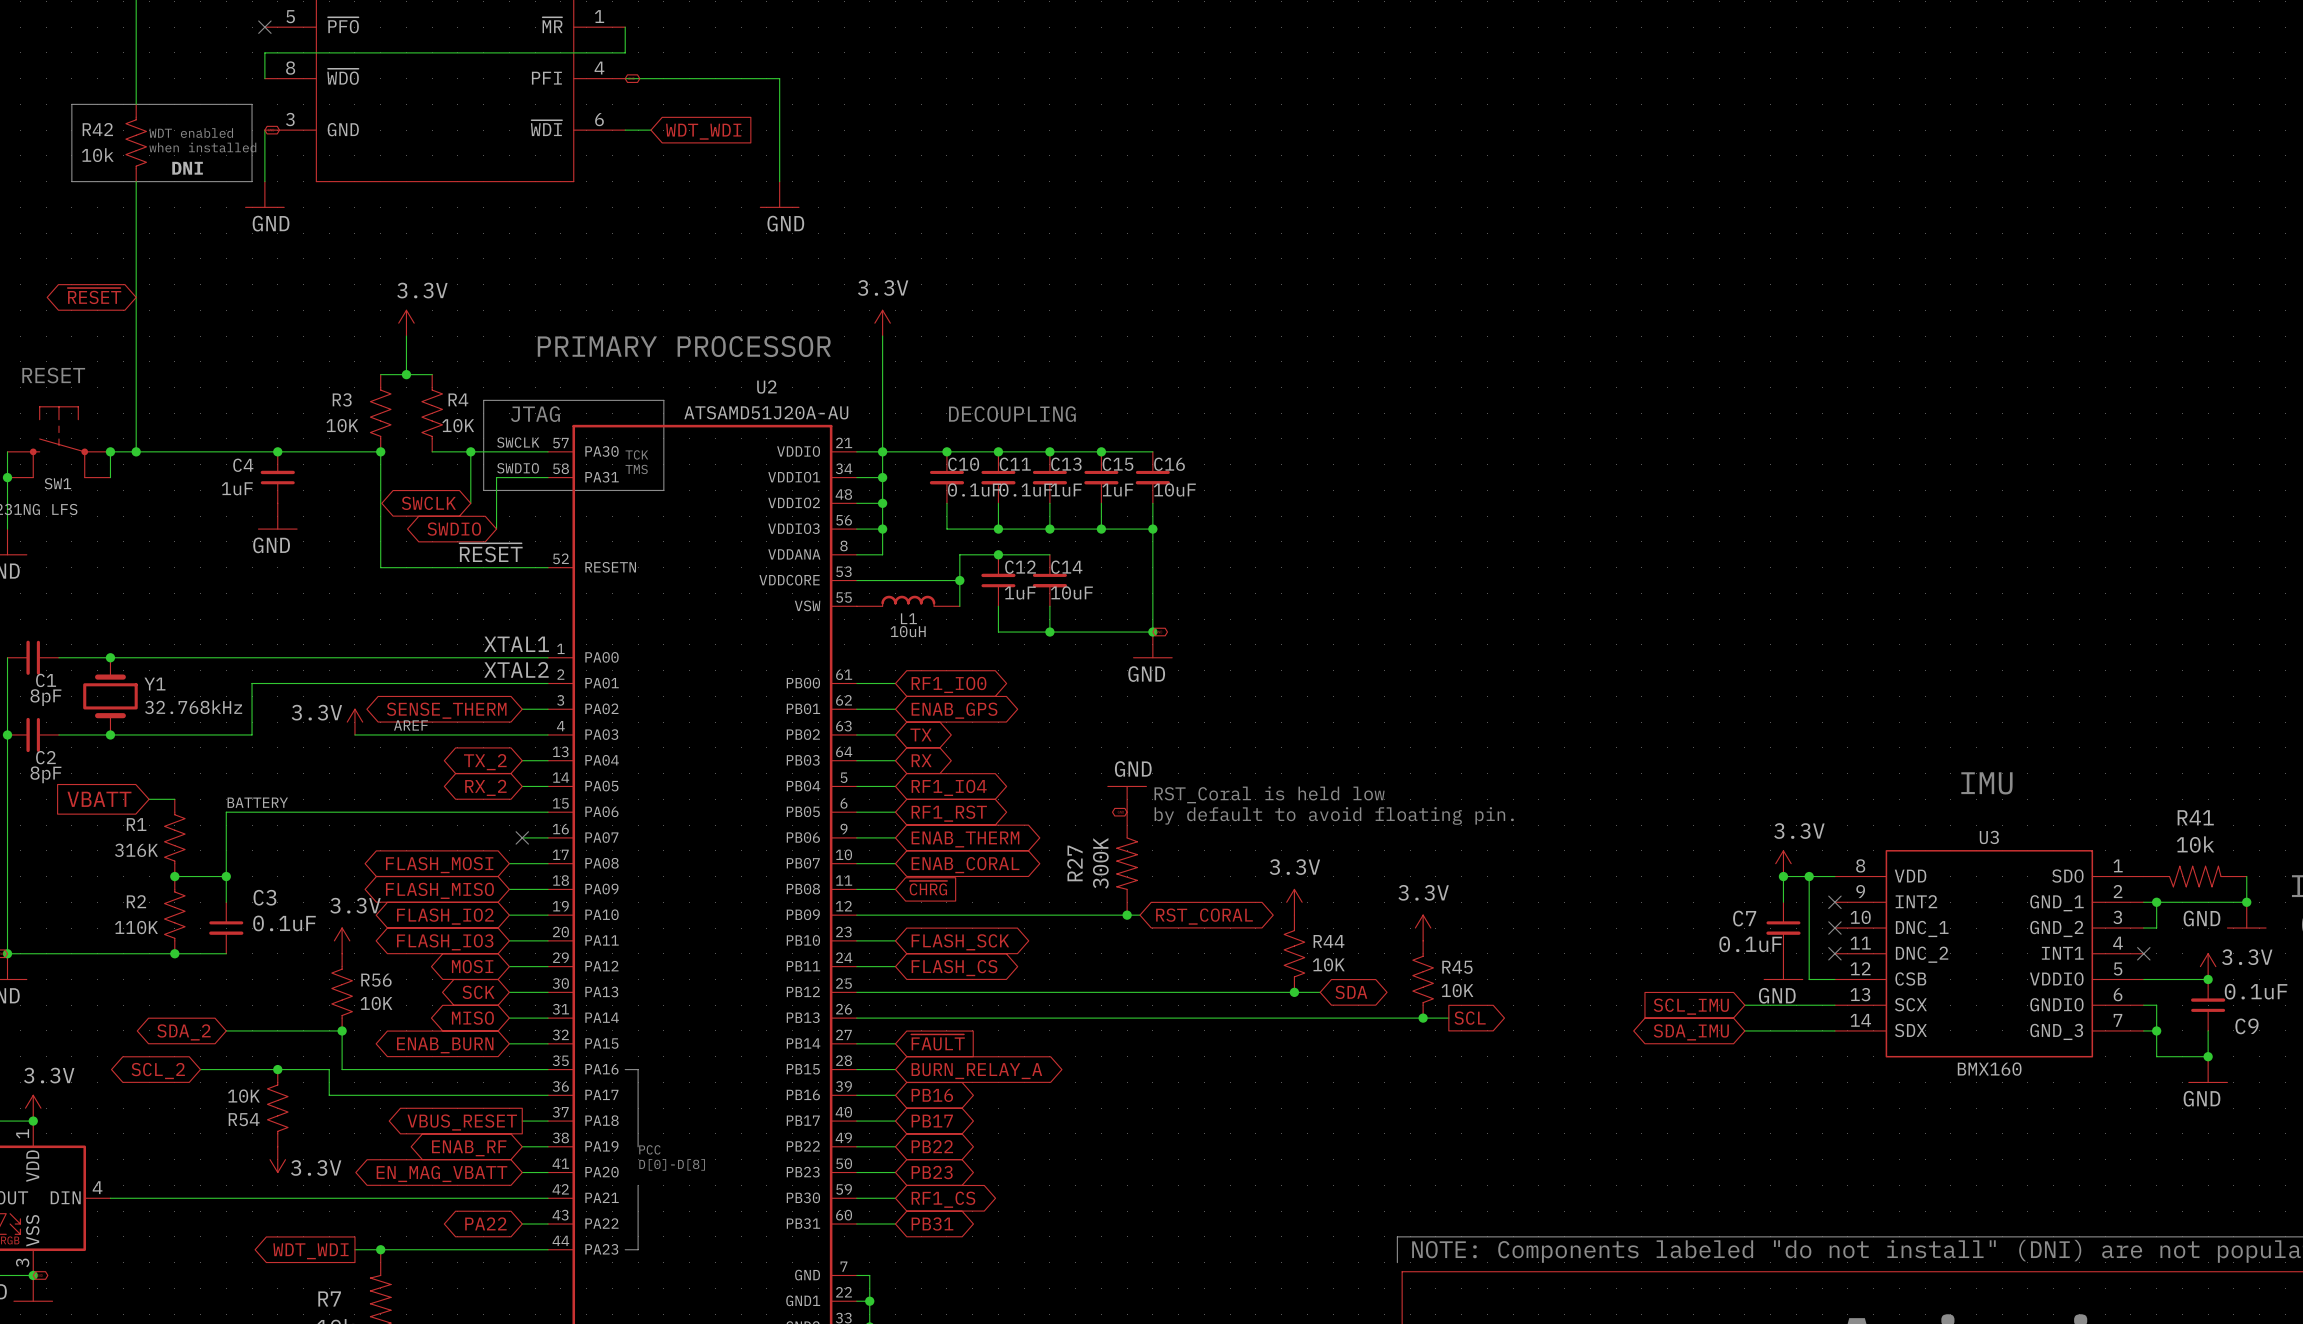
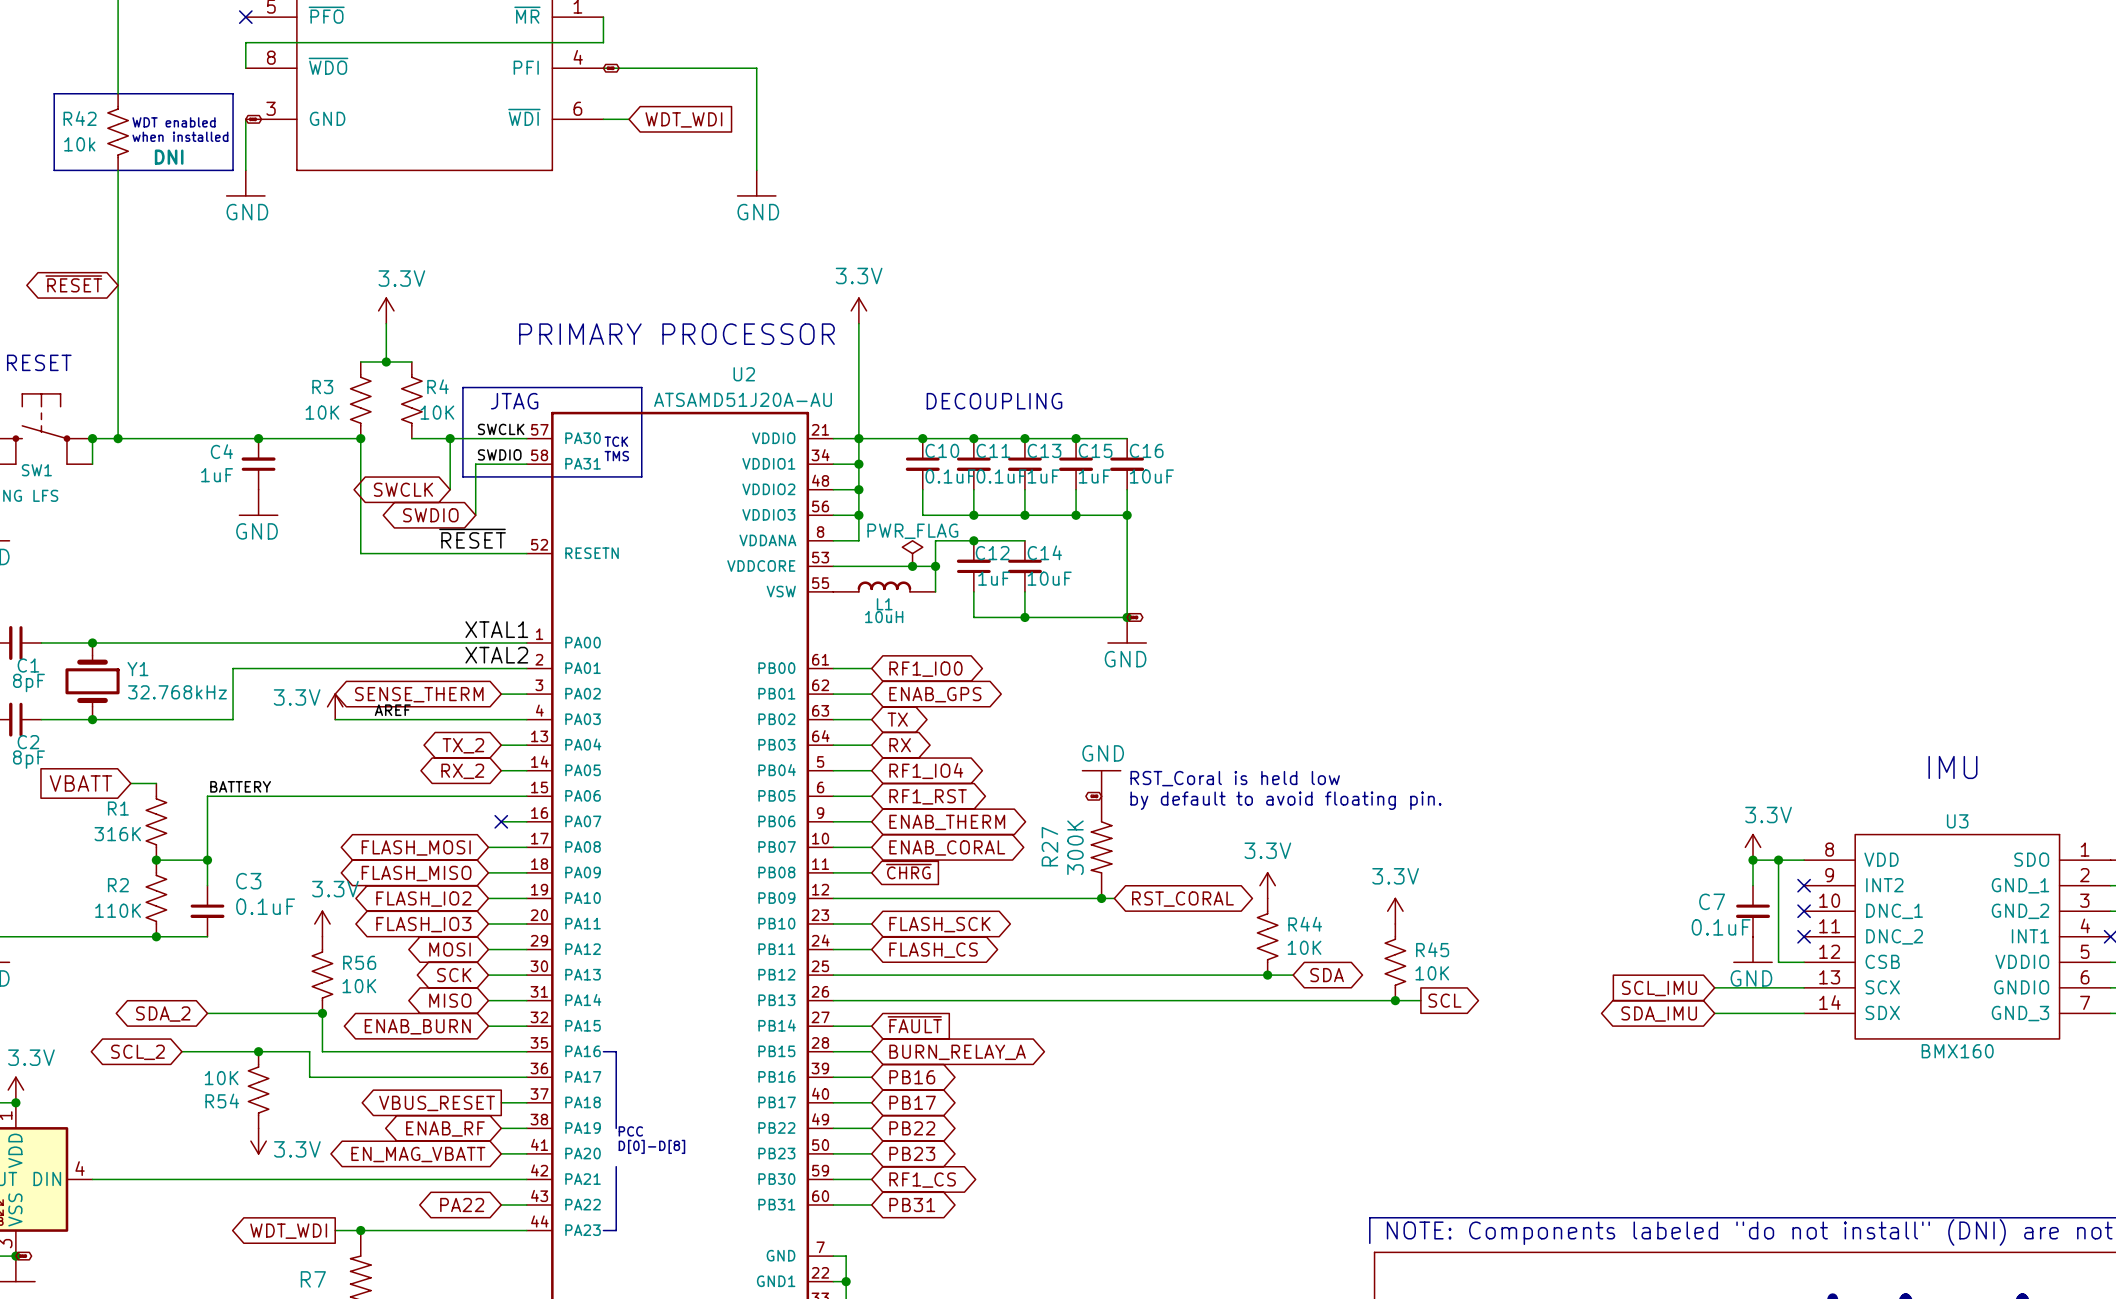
power symbol: none -> PWR_FLAG (912, 553)
junction: none -> (912, 566)

